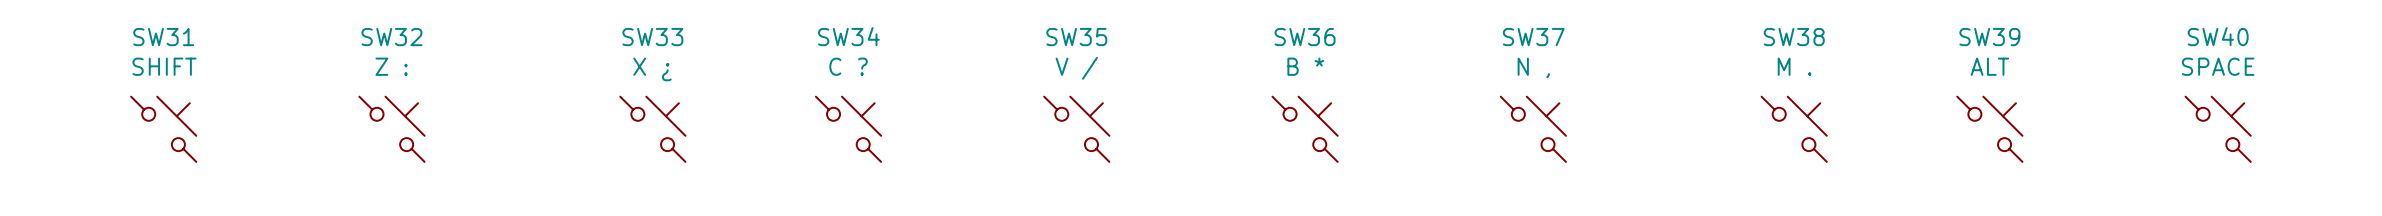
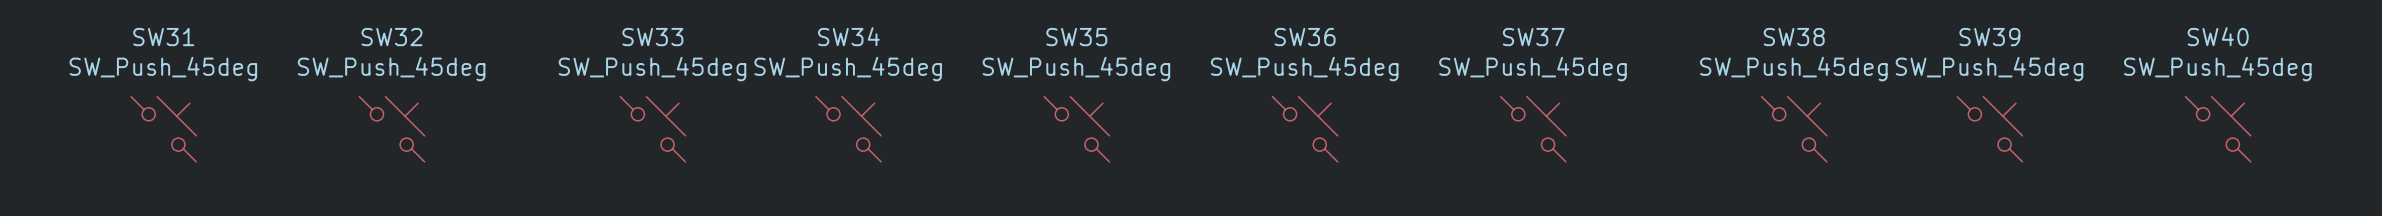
SW31 value: SHIFT (164, 66) -> SW_Push_45deg (163, 69)
SW32 value: Z : (391, 66) -> SW_Push_45deg (391, 69)
SW34 value: C ? (848, 66) -> SW_Push_45deg (848, 69)
SW36 value: B * (1305, 66) -> SW_Push_45deg (1304, 69)
SW38 value: M . (1794, 66) -> SW_Push_45deg (1793, 69)
SW39 value: ALT (1989, 66) -> SW_Push_45deg (1989, 69)
SW40 value: SPACE (2218, 66) -> SW_Push_45deg (2217, 69)
SW37 value: N , (1533, 67) -> SW_Push_45deg (1532, 69)
SW35 value: V / (1076, 68) -> SW_Push_45deg (1076, 69)
SW33 value: X ¿ (652, 69) -> SW_Push_45deg (652, 69)

